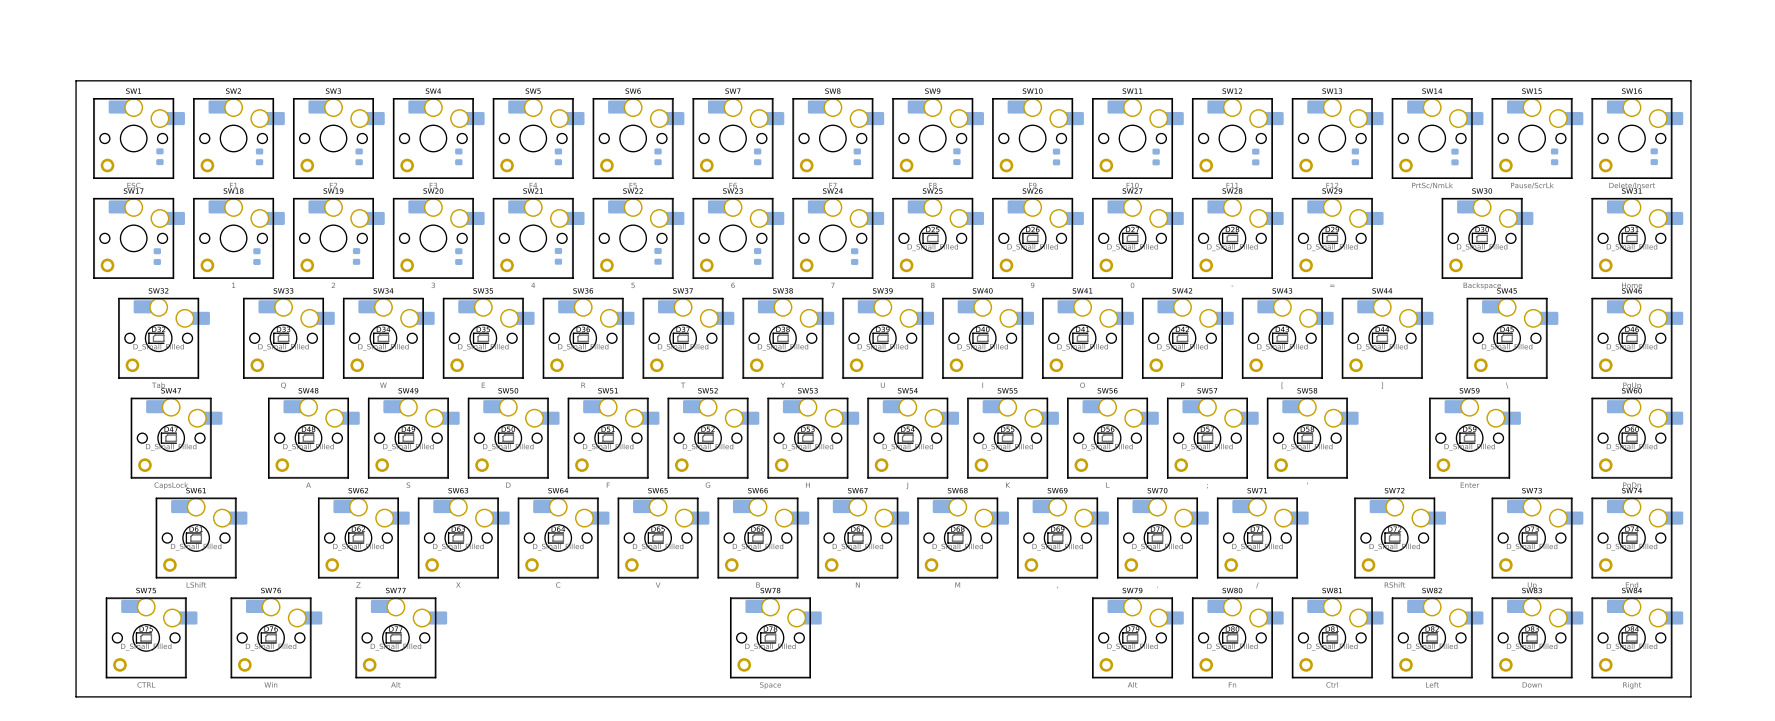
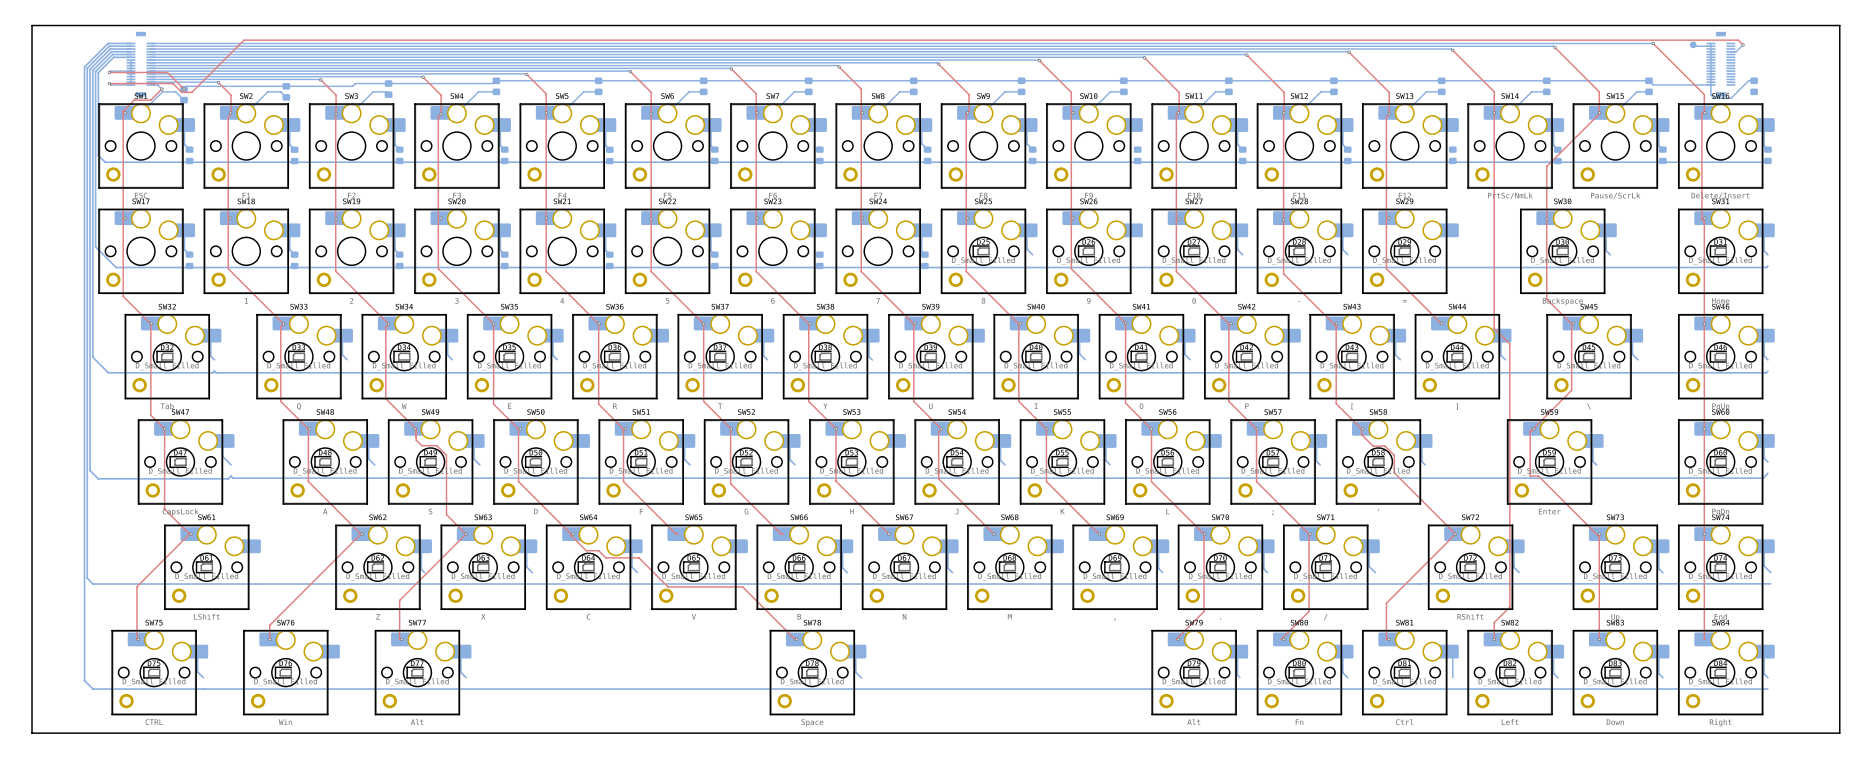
drawing: none -> [1689, 41, 1697, 49]
bottom track: none -> (130, 43) (108, 43) (84, 66) (84, 680) (92, 689) (1767, 689)
bottom track: none -> (150, 43) (1653, 43)
top track: none -> (1653, 43) (1704, 94) (1704, 112)
via: none -> (1653, 43)
bottom track: none -> (1710, 43) (1710, 94) (1714, 98) (1731, 98) (1748, 80) (1754, 80)
bottom track: none -> (1693, 44) (1710, 46)
top track: none -> (1743, 44) (1738, 40) (244, 40) (191, 92) (181, 92) (172, 83) (109, 83)
bottom track: none -> (1743, 44) (1736, 51) (1730, 51)
via: none -> (1743, 44)
bottom track: none -> (130, 46) (109, 46) (87, 68) (87, 578) (92, 584) (1770, 583)
bottom track: none -> (150, 46) (1555, 47)
top track: none -> (1555, 47) (1599, 91) (1599, 113) (1546, 166) (1546, 299) (1571, 324)
via: none -> (1555, 47)
bottom track: none -> (130, 49) (110, 49) (90, 69) (90, 470) (98, 478) (228, 478) (231, 476) (232, 478) (1763, 478) (1767, 473)
bottom track: none -> (150, 49) (1452, 50)
top track: none -> (1452, 50) (1494, 91) (1494, 113)
via: none -> (1452, 50)
bottom track: none -> (130, 51) (111, 51) (92, 70) (92, 357) (108, 372) (212, 372) (214, 371) (216, 372) (1766, 372) (1767, 371)
bottom track: none -> (150, 51) (1349, 52)
top track: none -> (1349, 52) (1389, 92) (1389, 113) (1386, 116) (1386, 268) (1441, 323)
via: none -> (1349, 52)
bottom track: none -> (130, 54) (112, 54) (95, 71) (95, 246) (116, 267) (1767, 266)
bottom track: none -> (150, 54) (1246, 55)
top track: none -> (1246, 55) (1284, 92) (1283, 273) (1336, 326) (1336, 403) (1361, 429)
via: none -> (1246, 55)
bottom track: none -> (130, 57) (113, 57) (98, 72) (98, 155) (105, 162) (1767, 160)
bottom track: none -> (150, 57) (1144, 57)
top track: none -> (1144, 57) (1179, 92) (1178, 112)
via: none -> (1144, 57)
bottom track: none -> (130, 60) (130, 71) (109, 72)
bottom track: none -> (150, 60) (1039, 60)
top track: none -> (1039, 60) (1071, 92) (1071, 268) (1125, 323) (1125, 403) (1151, 429) (1151, 481) (1204, 534)
via: none -> (1039, 60)
bottom track: none -> (150, 62) (938, 64)
part: none -> (140, 64)
top track: none -> (938, 64) (969, 94) (969, 111) (966, 113)
via: none -> (938, 64)
part: none -> (1720, 64)
bottom track: none -> (150, 65) (839, 66)
top track: none -> (839, 66) (861, 89) (861, 271) (913, 324)
via: none -> (839, 66)
bottom track: none -> (150, 68) (731, 68)
top track: none -> (731, 68) (756, 93) (756, 271) (808, 324)
via: none -> (731, 68)
bottom track: none -> (150, 71) (630, 71)
top track: none -> (630, 71) (651, 92) (651, 271) (703, 324) (703, 401) (731, 429) (730, 483) (781, 534) (783, 534)
via: none -> (630, 71)
top track: none -> (109, 72) (167, 72) (184, 89)
via: none -> (109, 72)
bottom track: none -> (130, 73) (130, 84) (109, 83)
bottom track: none -> (150, 73) (526, 74)
top track: none -> (526, 74) (546, 93) (546, 271) (598, 324)
via: none -> (526, 74)
bottom track: none -> (150, 76) (423, 77)
top track: none -> (423, 77) (441, 95) (441, 113) (438, 116) (438, 268) (493, 324) (493, 404) (518, 429)
via: none -> (423, 77)
bottom track: none -> (150, 79) (320, 79)
top track: none -> (320, 79) (336, 95) (335, 271) (388, 324) (385, 326) (385, 398) (416, 429) (416, 440) (421, 445) (436, 445) (446, 455) (446, 514) (465, 534) (399, 600) (399, 639) (401, 639)
via: none -> (320, 79)
bottom track: none -> (150, 82) (218, 82)
top track: none -> (218, 82) (231, 95) (231, 113) (228, 116) (228, 268) (283, 324) (280, 326) (280, 401) (308, 429)
via: none -> (218, 82)
via: none -> (109, 83)
board edge: (76, 80) (1690, 80) (1690, 696) (76, 696) (76, 80) -> (32, 25) (32, 733) (1839, 733) (1839, 25) (32, 25)
bottom track: none -> (150, 84) (157, 84) (161, 89)
bottom track: none -> (1710, 84) (1653, 84) (1649, 80) (496, 80) (493, 83) (186, 86) (184, 89)
part: none -> (496, 86)
part: none -> (598, 86)
part: none -> (703, 86)
part: none -> (808, 86)
part: none -> (913, 86)
part: none -> (1021, 86)
part: none -> (1123, 86)
part: none -> (1228, 86)
part: none -> (1333, 86)
part: none -> (1441, 86)
part: none -> (1546, 86)
part: none -> (1649, 86)
part: none -> (1754, 86)
top track: none -> (161, 89) (150, 100) (134, 100) (123, 111)
via: none -> (161, 89)
via: none -> (184, 89)
part: none -> (388, 89)
part: none -> (286, 91)
bottom track: none -> (496, 91) (478, 91) (456, 113)
bottom track: none -> (595, 91) (583, 91) (562, 113)
bottom track: none -> (700, 91) (689, 91) (667, 113)
bottom track: none -> (805, 91) (794, 91) (772, 113)
bottom track: none -> (911, 91) (899, 91) (878, 113)
bottom track: none -> (1018, 91) (1005, 91) (983, 113)
bottom track: none -> (1123, 91) (1110, 91) (1088, 113)
bottom track: none -> (1228, 91) (1215, 91) (1194, 113)
bottom track: none -> (1333, 91) (1321, 91) (1299, 113)
bottom track: none -> (1438, 91) (1426, 91) (1404, 113)
bottom track: none -> (1544, 91) (1531, 91) (1510, 113)
bottom track: none -> (1649, 91) (1636, 91) (1615, 113)
part: none -> (184, 94)
bottom track: none -> (388, 94) (385, 91) (373, 91) (351, 113)
bottom track: none -> (286, 97) (280, 91) (267, 91) (246, 113)
bottom track: none -> (184, 100) (175, 91) (162, 91) (140, 113)
top track: none -> (123, 111) (123, 296) (150, 324)
top track: none -> (1179, 111) (1176, 113) (1176, 271) (1228, 324)
top track: none -> (1704, 111) (1701, 113) (1701, 219) (1704, 221) (1704, 639)
via: none -> (125, 112)
via: none -> (230, 112)
via: none -> (546, 112)
via: none -> (757, 112)
via: none -> (862, 112)
via: none -> (967, 112)
via: none -> (1073, 112)
via: none -> (1178, 112)
via: none -> (1283, 112)
via: none -> (1494, 112)
via: none -> (1599, 112)
via: none -> (1704, 112)
via: none -> (336, 113)
via: none -> (441, 113)
via: none -> (651, 113)
top track: none -> (966, 113) (966, 271) (1018, 324)
via: none -> (1389, 113)
top track: none -> (1494, 114) (1494, 328) (1509, 344) (1509, 606) (1494, 622) (1494, 639)
bottom track: none -> (184, 125) (184, 144) (189, 149)
bottom track: none -> (289, 125) (289, 144) (294, 149)
bottom track: none -> (395, 125) (395, 144) (399, 149)
bottom track: none -> (500, 125) (500, 145) (504, 149)
bottom track: none -> (605, 125) (605, 145) (609, 149)
bottom track: none -> (710, 125) (710, 145) (714, 149)
bottom track: none -> (921, 125) (921, 143) (927, 149)
bottom track: none -> (1026, 125) (1026, 143) (1032, 149)
bottom track: none -> (1237, 125) (1237, 144) (1242, 149)
bottom track: none -> (1342, 125) (1342, 144) (1347, 149)
bottom track: none -> (1553, 125) (1553, 145) (1557, 149)
bottom track: none -> (1658, 125) (1658, 145) (1662, 149)
bottom track: none -> (1764, 125) (1764, 145) (1767, 149)
part position: (159, 156) -> (189, 155)
part position: (259, 156) -> (294, 155)
part position: (359, 156) -> (399, 155)
part position: (458, 156) -> (504, 155)
part position: (558, 156) -> (609, 155)
part position: (658, 156) -> (714, 155)
part position: (757, 156) -> (819, 155)
part position: (857, 156) -> (927, 155)
part position: (956, 156) -> (1032, 155)
part position: (1056, 156) -> (1137, 155)
part position: (1156, 156) -> (1242, 155)
part position: (1255, 156) -> (1347, 155)
part position: (1355, 156) -> (1452, 155)
part position: (1455, 156) -> (1557, 155)
part position: (1554, 156) -> (1662, 155)
part position: (1654, 156) -> (1767, 155)
via: none -> (125, 218)
via: none -> (230, 218)
via: none -> (441, 218)
via: none -> (546, 218)
via: none -> (757, 218)
via: none -> (862, 218)
via: none -> (967, 218)
via: none -> (1073, 218)
via: none -> (1389, 218)
via: none -> (1704, 218)
via: none -> (336, 219)
via: none -> (651, 219)
via: none -> (1179, 219)
via: none -> (1546, 219)
via: none -> (1283, 219)
bottom track: none -> (184, 230) (184, 249) (189, 254)
bottom track: none -> (289, 230) (289, 249) (294, 254)
bottom track: none -> (395, 230) (395, 250) (399, 254)
bottom track: none -> (500, 230) (500, 250) (504, 254)
bottom track: none -> (605, 230) (605, 250) (609, 254)
bottom track: none -> (710, 230) (710, 250) (714, 254)
bottom track: none -> (921, 230) (921, 251) (924, 254)
bottom track: none -> (1026, 230) (1026, 249) (1032, 254)
bottom track: none -> (1237, 230) (1237, 249) (1242, 254)
bottom track: none -> (1342, 230) (1342, 249) (1347, 254)
bottom track: none -> (1606, 230) (1606, 250) (1610, 254)
bottom track: none -> (1764, 230) (1764, 251) (1767, 254)
part position: (157, 256) -> (189, 260)
part position: (256, 256) -> (294, 260)
part position: (356, 256) -> (399, 260)
part position: (458, 256) -> (504, 260)
part position: (558, 256) -> (609, 260)
part position: (658, 256) -> (714, 260)
part position: (757, 256) -> (819, 260)
part position: (854, 256) -> (924, 260)
via: none -> (151, 323)
top track: none -> (599, 323) (598, 404) (623, 429)
via: none -> (599, 323)
via: none -> (809, 323)
via: none -> (915, 323)
via: none -> (1020, 323)
via: none -> (1125, 323)
via: none -> (1231, 323)
via: none -> (1336, 323)
via: none -> (1441, 323)
via: none -> (1573, 323)
top track: none -> (150, 324) (150, 415) (164, 429)
via: none -> (283, 324)
via: none -> (388, 324)
via: none -> (493, 324)
via: none -> (703, 324)
top track: none -> (808, 324) (808, 401) (836, 429) (835, 481) (888, 534)
top track: none -> (913, 324) (913, 401) (941, 429) (938, 431) (938, 478) (994, 534)
top track: none -> (1018, 324) (1018, 401) (1046, 429)
top track: none -> (1228, 324) (1228, 401) (1256, 429)
top track: none -> (1571, 324) (1571, 390) (1530, 431) (1530, 476) (1538, 476) (1599, 536)
via: none -> (1704, 324)
bottom track: none -> (210, 335) (210, 356) (214, 359)
bottom track: none -> (342, 335) (342, 354) (347, 359)
bottom track: none -> (447, 335) (447, 355) (452, 359)
bottom track: none -> (552, 335) (552, 355) (557, 359)
bottom track: none -> (763, 335) (763, 356) (767, 359)
bottom track: none -> (868, 335) (868, 356) (872, 359)
bottom track: none -> (1079, 335) (1079, 354) (1085, 359)
bottom track: none -> (1184, 335) (1184, 354) (1190, 359)
bottom track: none -> (1395, 335) (1395, 354) (1400, 359)
bottom track: none -> (1500, 335) (1500, 355) (1505, 359)
bottom track: none -> (1632, 335) (1632, 354) (1637, 359)
bottom track: none -> (1764, 335) (1764, 356) (1767, 359)
top track: none -> (164, 428) (164, 509) (189, 534)
via: none -> (164, 428)
top track: none -> (308, 429) (308, 481) (360, 534)
via: none -> (309, 428)
via: none -> (414, 428)
top track: none -> (518, 429) (518, 481) (571, 534)
via: none -> (520, 428)
top track: none -> (623, 429) (623, 481) (678, 534)
via: none -> (625, 428)
via: none -> (731, 429)
via: none -> (836, 429)
via: none -> (941, 429)
top track: none -> (1046, 429) (1046, 481) (1099, 534)
via: none -> (1046, 428)
via: none -> (1151, 429)
top track: none -> (1256, 429) (1256, 481) (1309, 534)
via: none -> (1257, 428)
top track: none -> (1361, 429) (1361, 434) (1373, 446) (1385, 446) (1394, 455) (1394, 472) (1455, 534)
via: none -> (1362, 428)
via: none -> (1533, 428)
via: none -> (1704, 429)
bottom track: none -> (223, 440) (222, 456) (231, 464)
bottom track: none -> (368, 440) (368, 458) (374, 465)
bottom track: none -> (473, 440) (473, 459) (479, 464)
bottom track: none -> (684, 440) (684, 459) (689, 464)
bottom track: none -> (789, 440) (789, 459) (794, 464)
bottom track: none -> (1000, 440) (1000, 460) (1004, 464)
bottom track: none -> (1105, 440) (1105, 460) (1110, 464)
bottom track: none -> (1316, 440) (1316, 461) (1320, 464)
bottom track: none -> (1421, 440) (1421, 461) (1425, 464)
bottom track: none -> (1592, 440) (1592, 461) (1596, 464)
bottom track: none -> (1764, 440) (1764, 458) (1767, 461)
top track: none -> (189, 534) (137, 586) (138, 639)
via: none -> (191, 534)
top track: none -> (360, 534) (269, 625) (269, 639)
via: none -> (362, 534)
via: none -> (465, 534)
top track: none -> (571, 534) (586, 550) (598, 550) (605, 557) (639, 557) (668, 586) (742, 586) (796, 639)
via: none -> (572, 534)
via: none -> (888, 534)
via: none -> (994, 534)
via: none -> (1099, 534)
top track: none -> (1204, 534) (1204, 611) (1176, 639) (1178, 639)
via: none -> (1204, 534)
top track: none -> (1309, 534) (1309, 611) (1281, 639) (1283, 639)
via: none -> (1310, 534)
via: none -> (1454, 534)
top track: none -> (1455, 534) (1386, 603) (1386, 639) (1389, 639)
top track: none -> (1599, 534) (1599, 639)
via: none -> (1599, 534)
via: none -> (1704, 534)
bottom track: none -> (421, 546) (421, 569) (424, 572)
bottom track: none -> (526, 546) (526, 567) (532, 572)
bottom track: none -> (631, 546) (631, 567) (637, 572)
bottom track: none -> (842, 546) (842, 567) (847, 572)
bottom track: none -> (947, 546) (947, 568) (952, 572)
bottom track: none -> (1158, 546) (1158, 568) (1162, 572)
bottom track: none -> (1263, 546) (1263, 568) (1267, 572)
bottom track: none -> (1369, 546) (1369, 566) (1375, 572)
bottom track: none -> (1513, 546) (1513, 567) (1519, 572)
bottom track: none -> (1658, 546) (1658, 568) (1662, 572)
bottom track: none -> (1764, 546) (1764, 565) (1770, 572)
via: none -> (138, 639)
via: none -> (270, 639)
via: none -> (401, 639)
via: none -> (796, 639)
via: none -> (1178, 639)
via: none -> (1283, 639)
via: none -> (1389, 639)
via: none -> (1494, 639)
via: none -> (1599, 639)
bottom track: none -> (197, 651) (197, 671) (203, 677)
bottom track: none -> (460, 651) (460, 672) (465, 677)
bottom track: none -> (855, 651) (855, 672) (861, 677)
bottom track: none -> (1237, 651) (1237, 675) (1239, 677)
bottom track: none -> (1342, 651) (1342, 672) (1347, 677)
bottom track: none -> (1448, 651) (1452, 656) (1452, 677)
bottom track: none -> (1553, 651) (1553, 673) (1557, 677)
bottom track: none -> (1658, 651) (1658, 673) (1662, 677)
bottom track: none -> (1764, 651) (1764, 673) (1767, 677)

